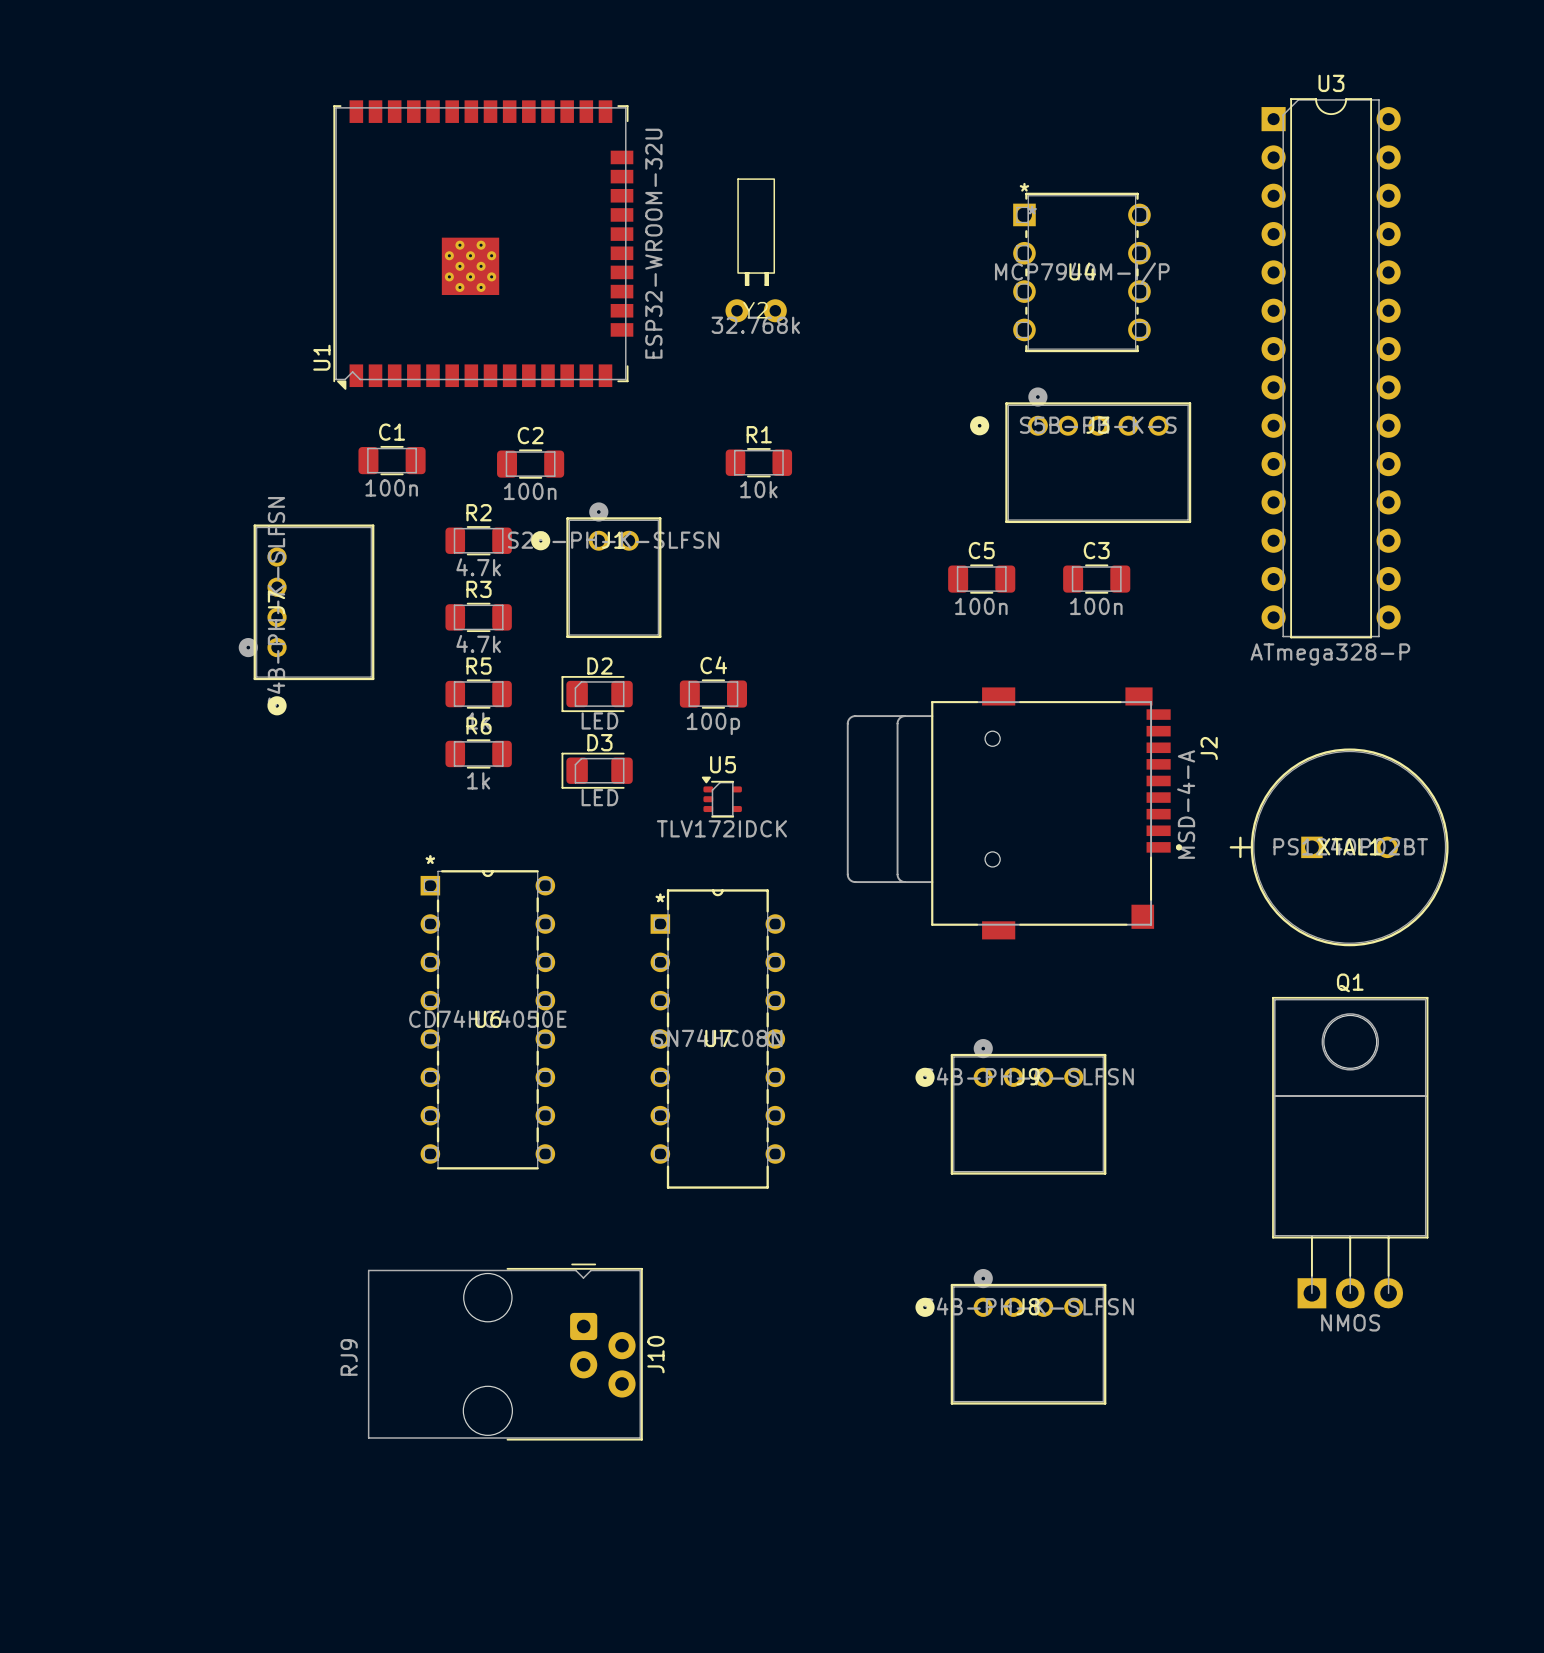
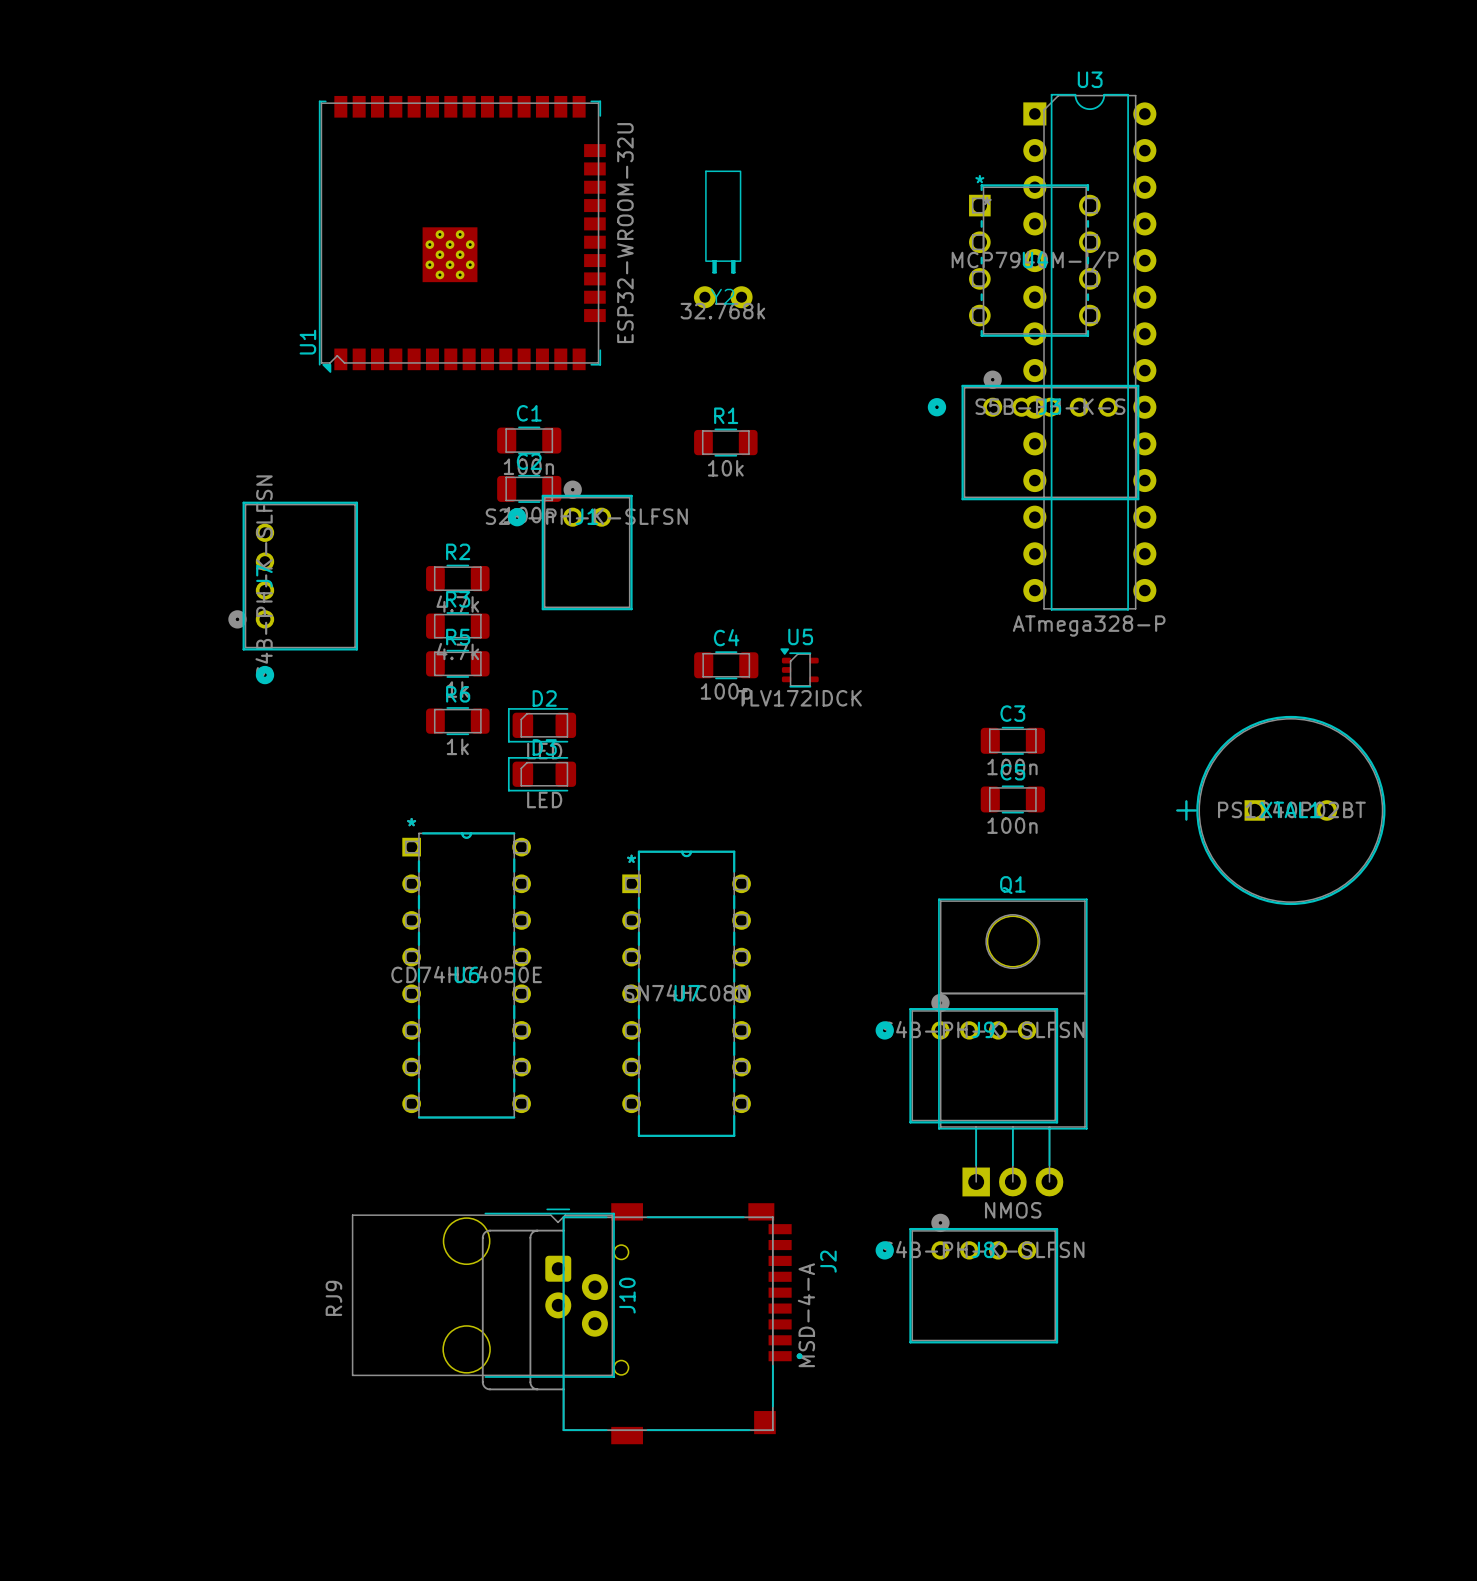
U3 position: (1331, 368) -> (1089, 352)
C1 position: (392, 460) -> (529, 440)
C2 position: (530, 464) -> (529, 488)
R2 position: (478, 540) -> (457, 578)
C5 position: (981, 579) -> (1012, 799)
C3 position: (1096, 579) -> (1012, 740)
R3 position: (478, 617) -> (457, 626)
D2 position: (597, 694) -> (542, 725)
C4 position: (713, 694) -> (726, 665)
D3 position: (597, 770) -> (542, 774)
U5 position: (721, 797) -> (799, 667)
J2 position: (1014, 813) -> (642, 1323)
Q1 position: (1350, 1152) -> (1012, 1047)

